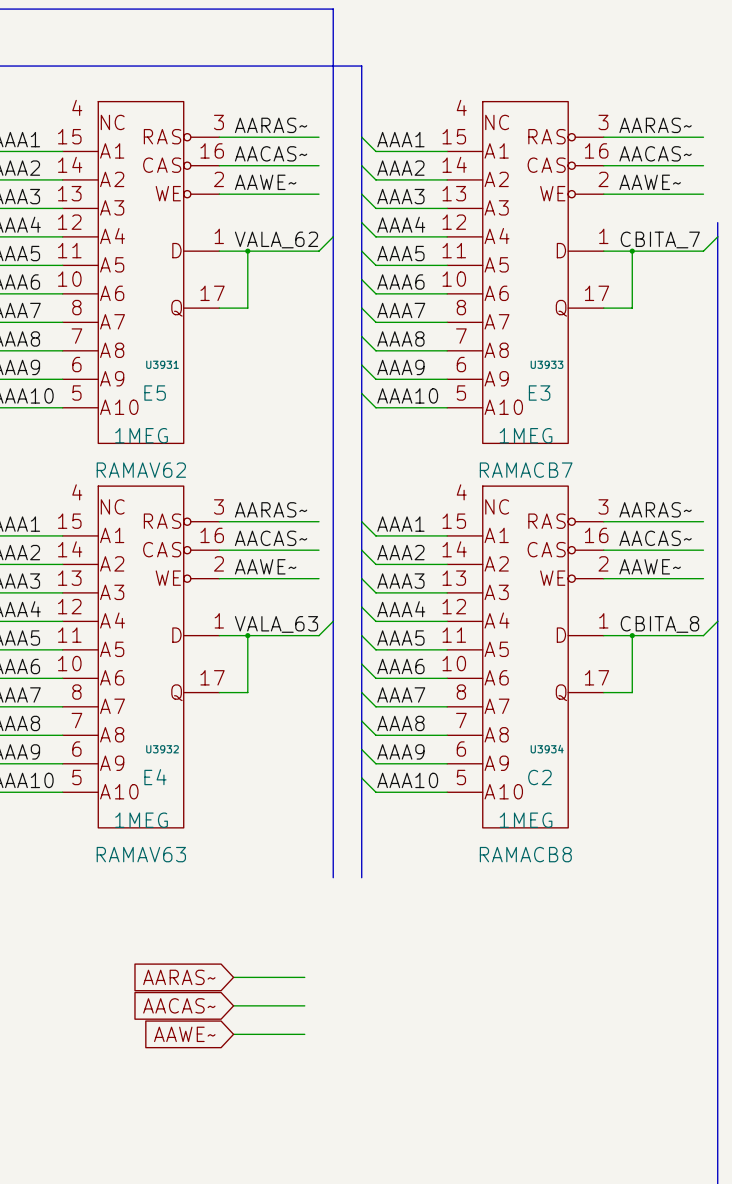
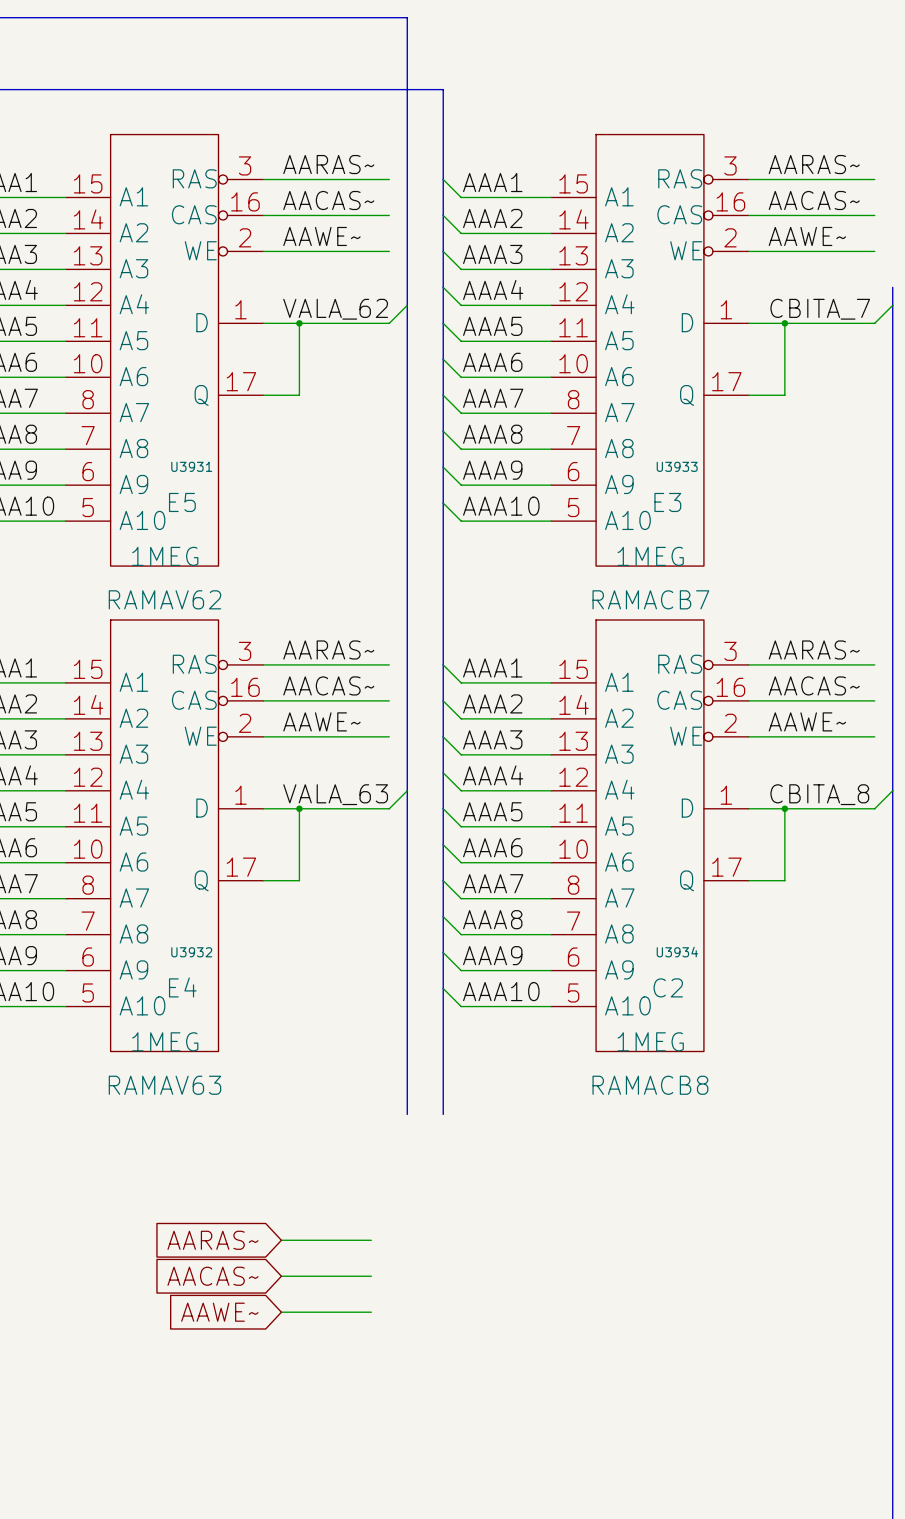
U3931 symbol: [62, 101, 220, 444] -> [65, 134, 264, 567]
U3933 symbol: [447, 101, 604, 444] -> [551, 134, 749, 567]
U3932 symbol: [62, 486, 220, 828] -> [65, 620, 264, 1052]
U3934 symbol: [447, 486, 604, 828] -> [551, 620, 749, 1052]

